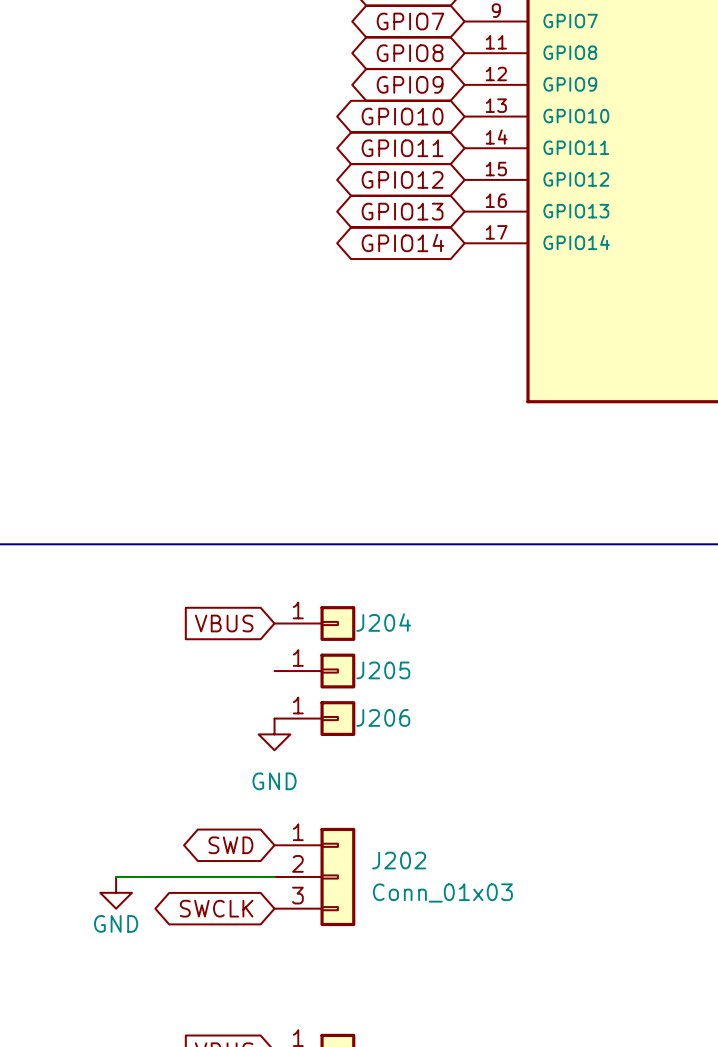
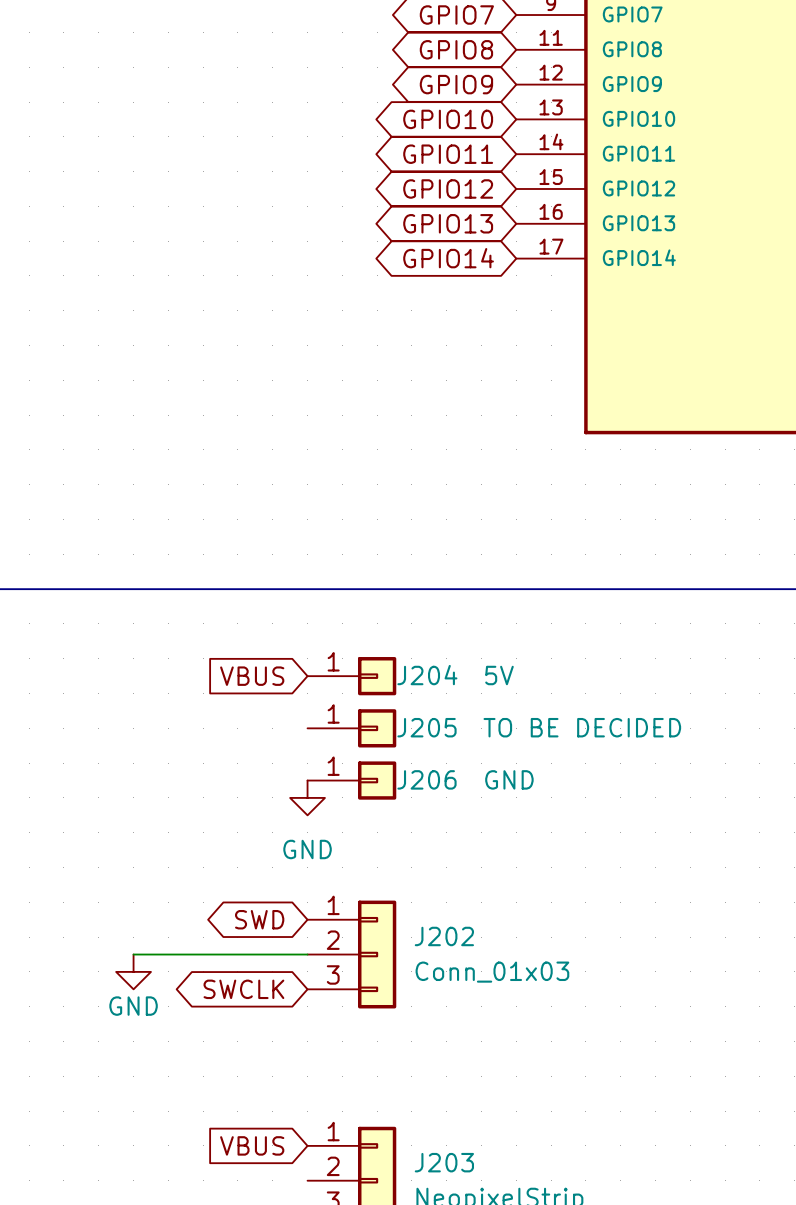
J204 value: none -> 5V (499, 675)
J205 value: none -> TO BE DECIDED (582, 727)
J206 value: none -> GND (509, 779)

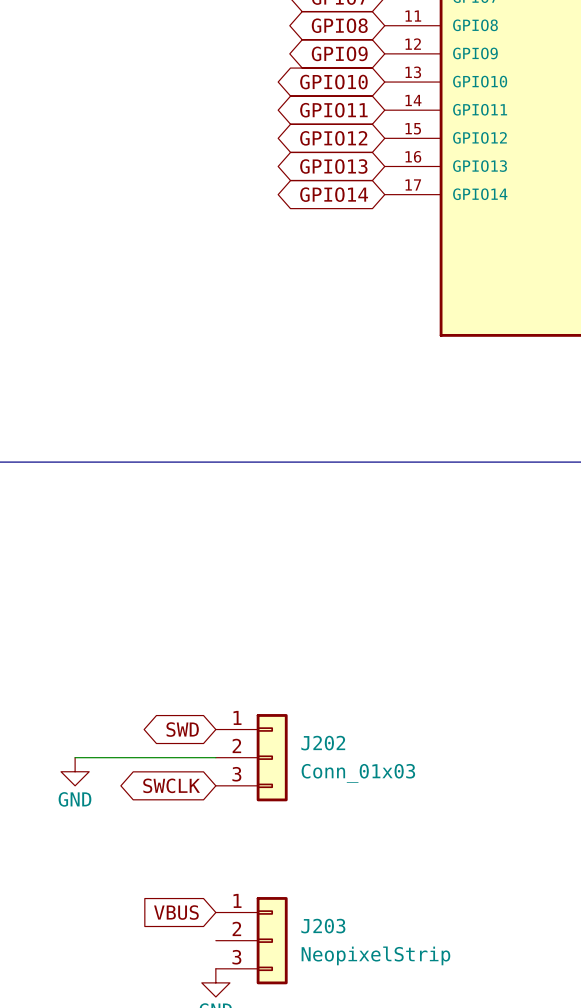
global label: VBUS (252, 676) -> none
J204: 5V (351, 676) -> none
J205: TO BE DECIDED (351, 728) -> none
J206: GND (351, 780) -> none
power symbol: GND (307, 797) -> none

